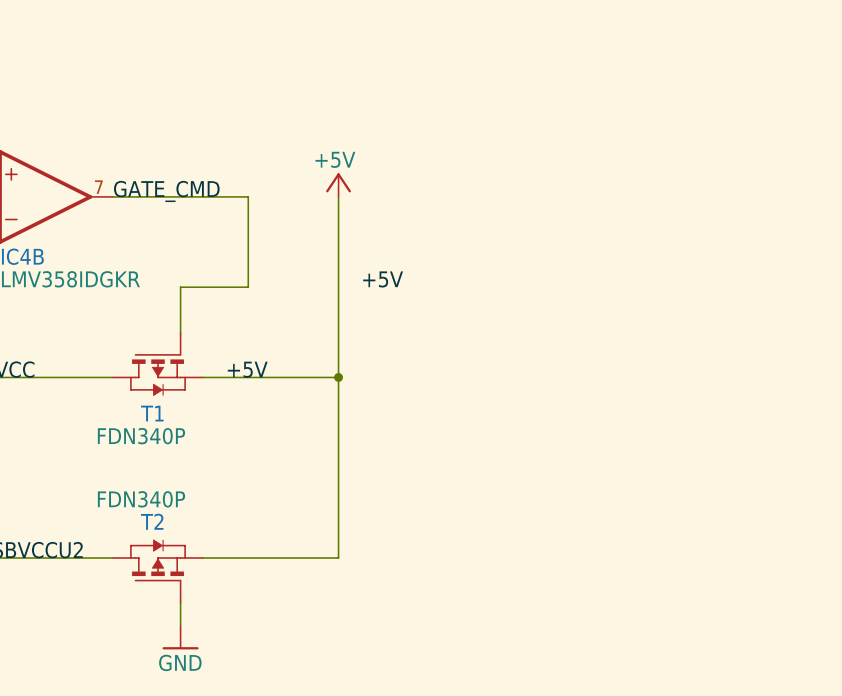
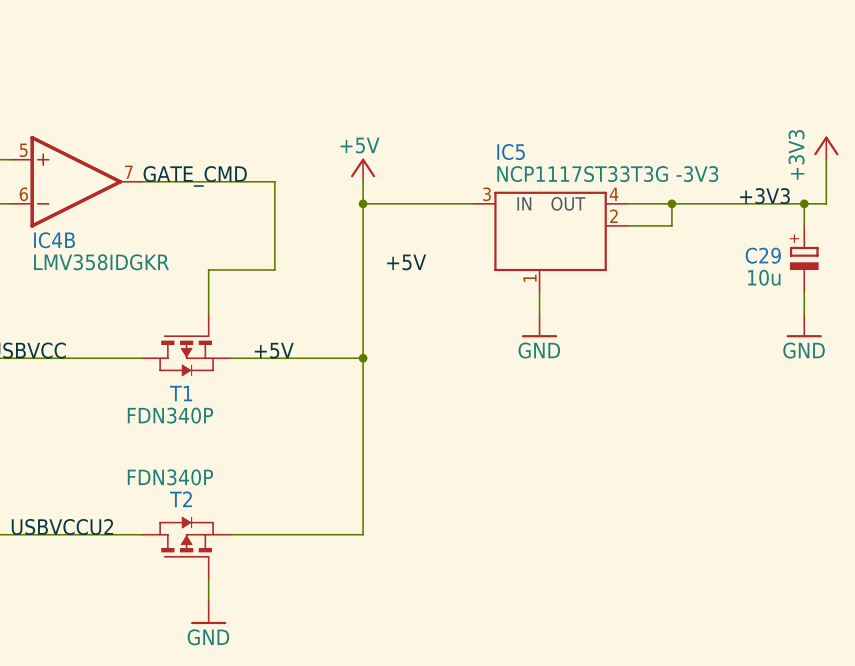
power symbol: none -> +3V3 (826, 148)
wire: none -> (826, 159) (826, 203) (627, 203)
label: none -> +3V3 (764, 196)
wire: none -> (363, 203) (473, 203)
junction: none -> (363, 203)
wire: none -> (671, 203) (671, 225) (627, 225)
junction: none -> (671, 203)
wire: none -> (804, 203) (804, 225)
junction: none -> (804, 203)
IC5: none -> NCP1117ST33T3G -3V3 (550, 241)
C29: none -> 10u (804, 258)
wire: none -> (539, 292) (539, 314)
wire: none -> (804, 292) (804, 314)
power symbol: none -> GND (539, 325)
power symbol: none -> GND (804, 325)

